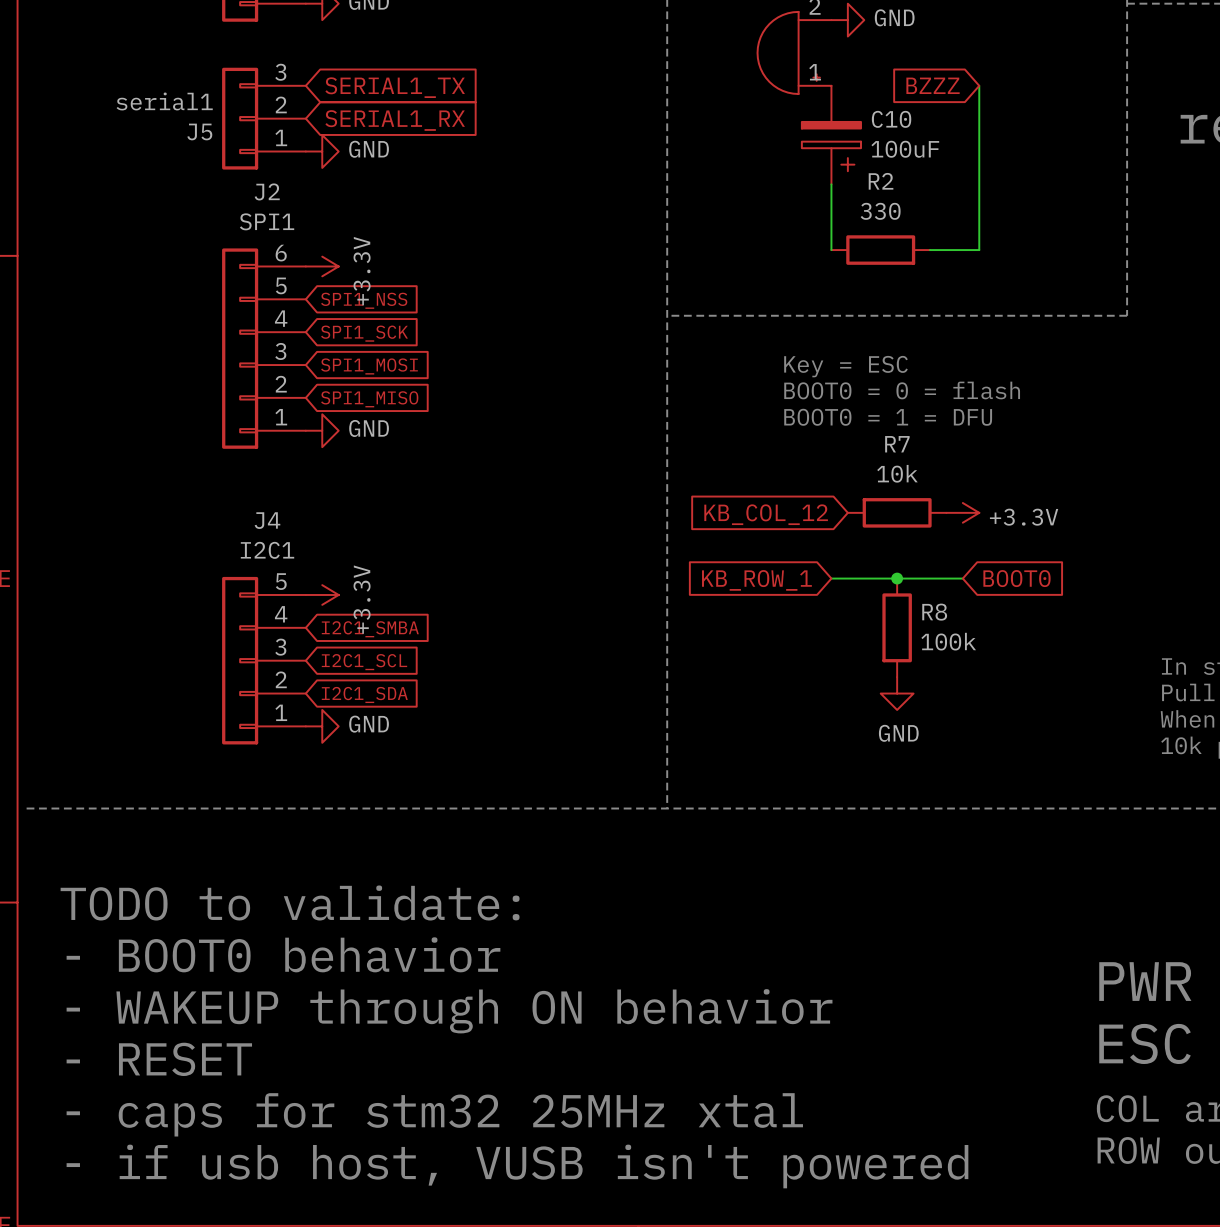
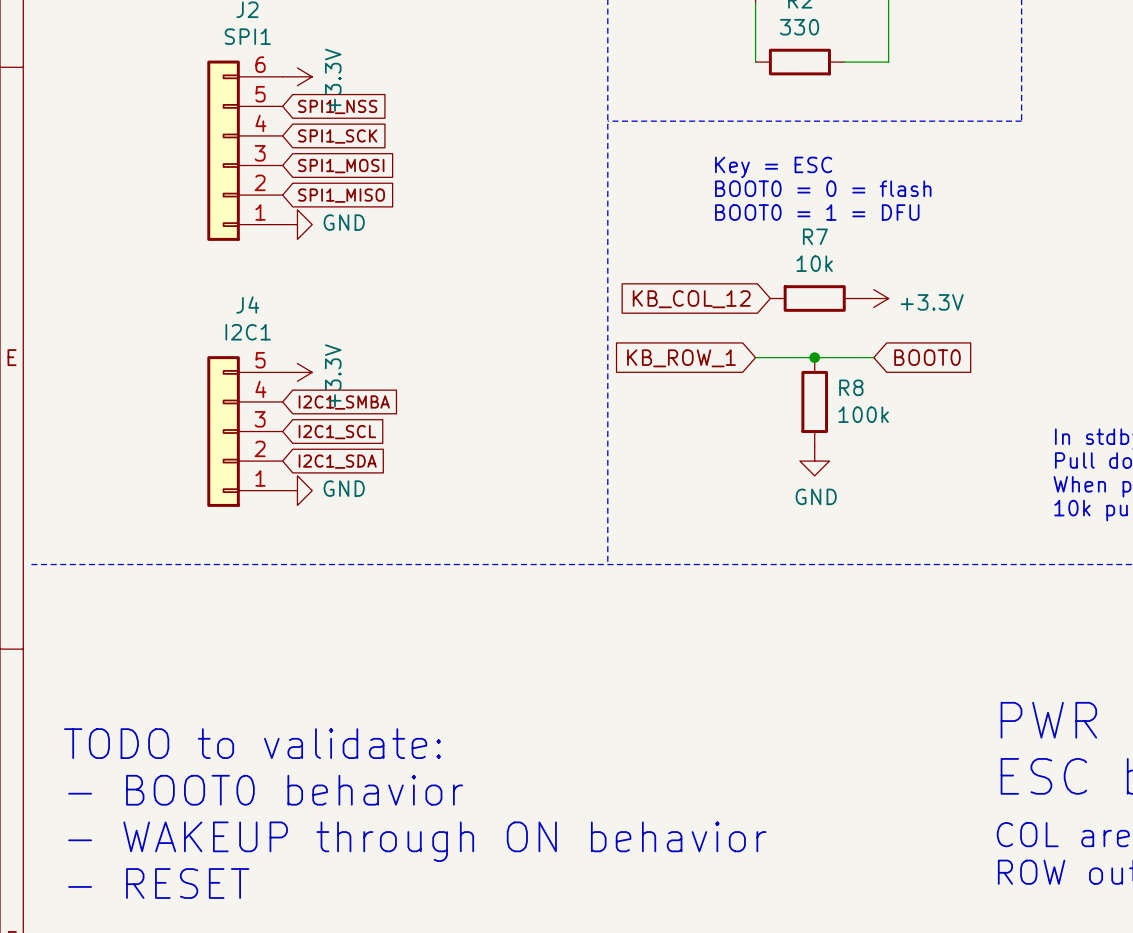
text: TODO to validate: (290, 902) -> none
text: - BOOT0 behavior (283, 954) -> none
text: - WAKEUP through ON behavior (449, 1011) -> TODO to validate: (252, 743)
text: - RESET (159, 1059) -> - BOOT0 behavior (265, 790)
text: - caps for stm32 25MHz xtal (434, 1114) -> - WAKEUP through ON behavior (417, 841)
text: - if usb host, VUSB isn't powered (517, 1166) -> - RESET (158, 883)

